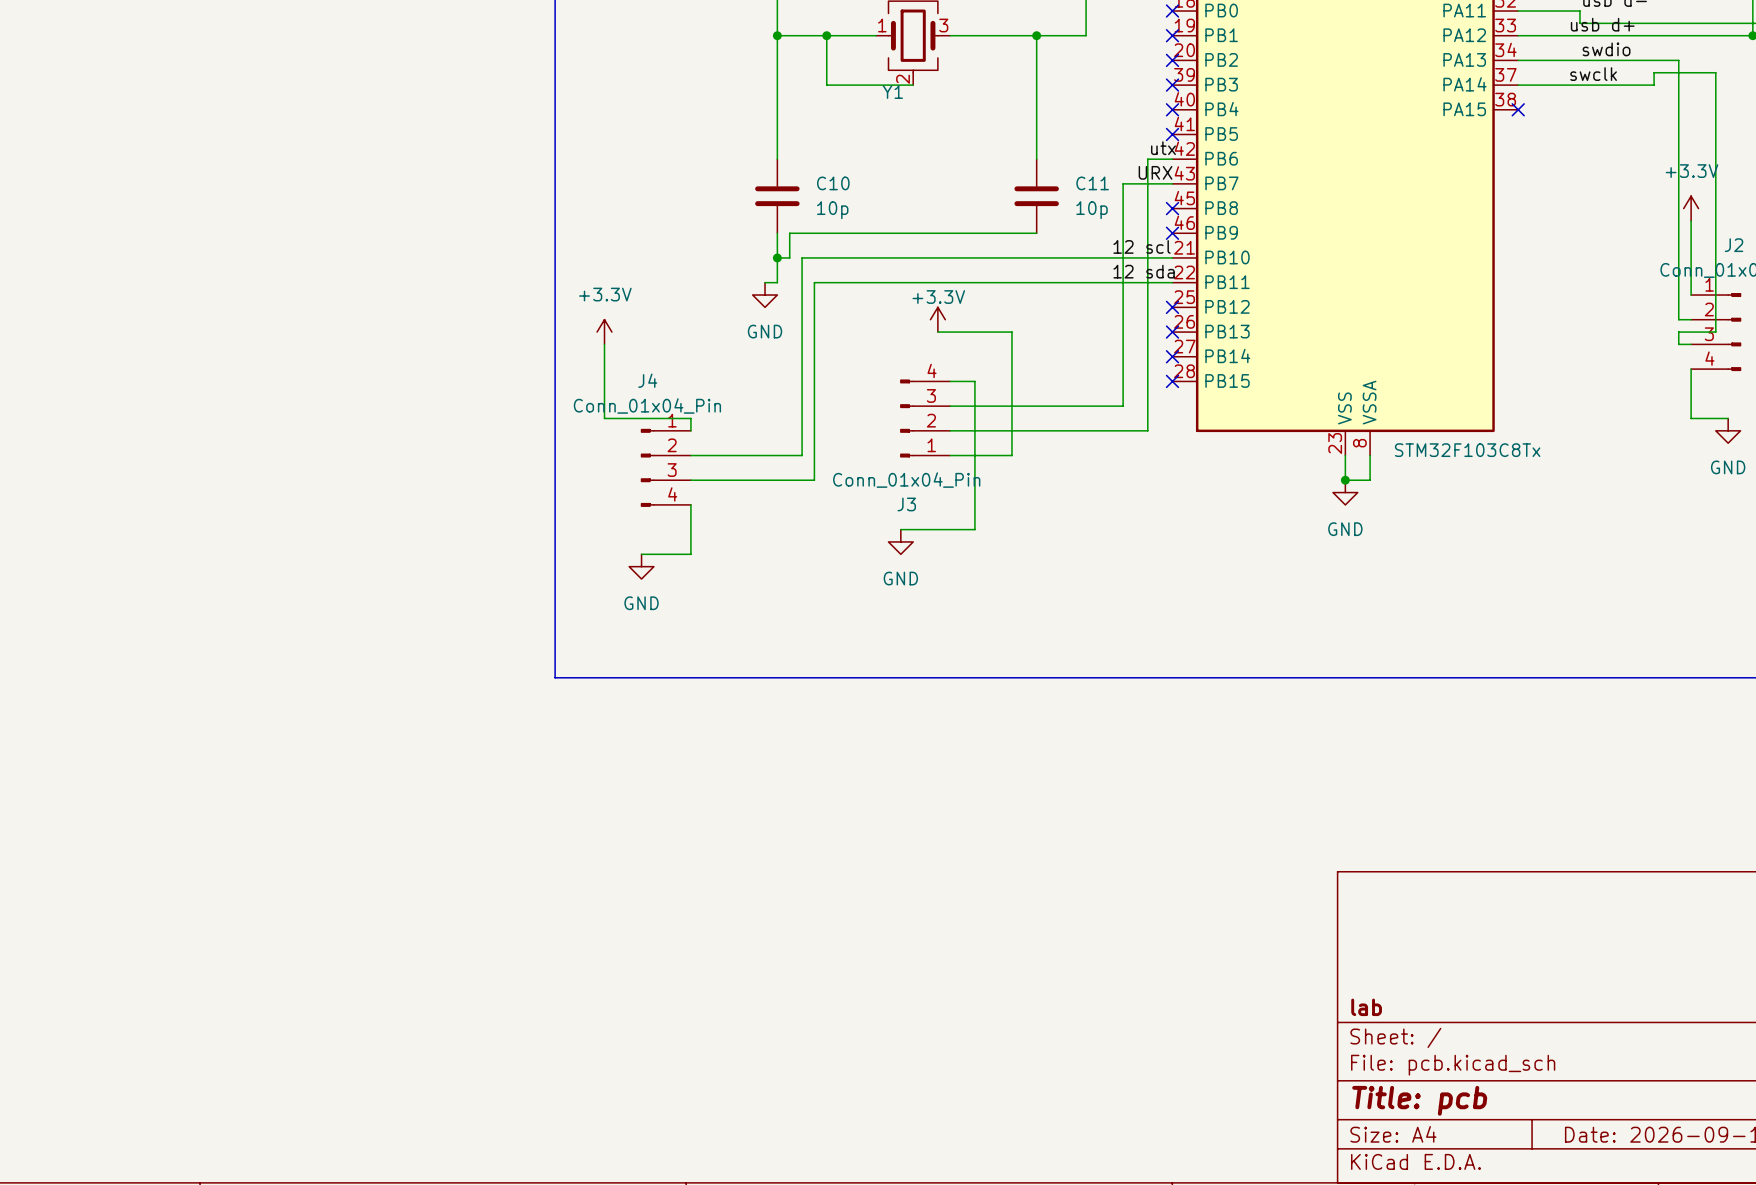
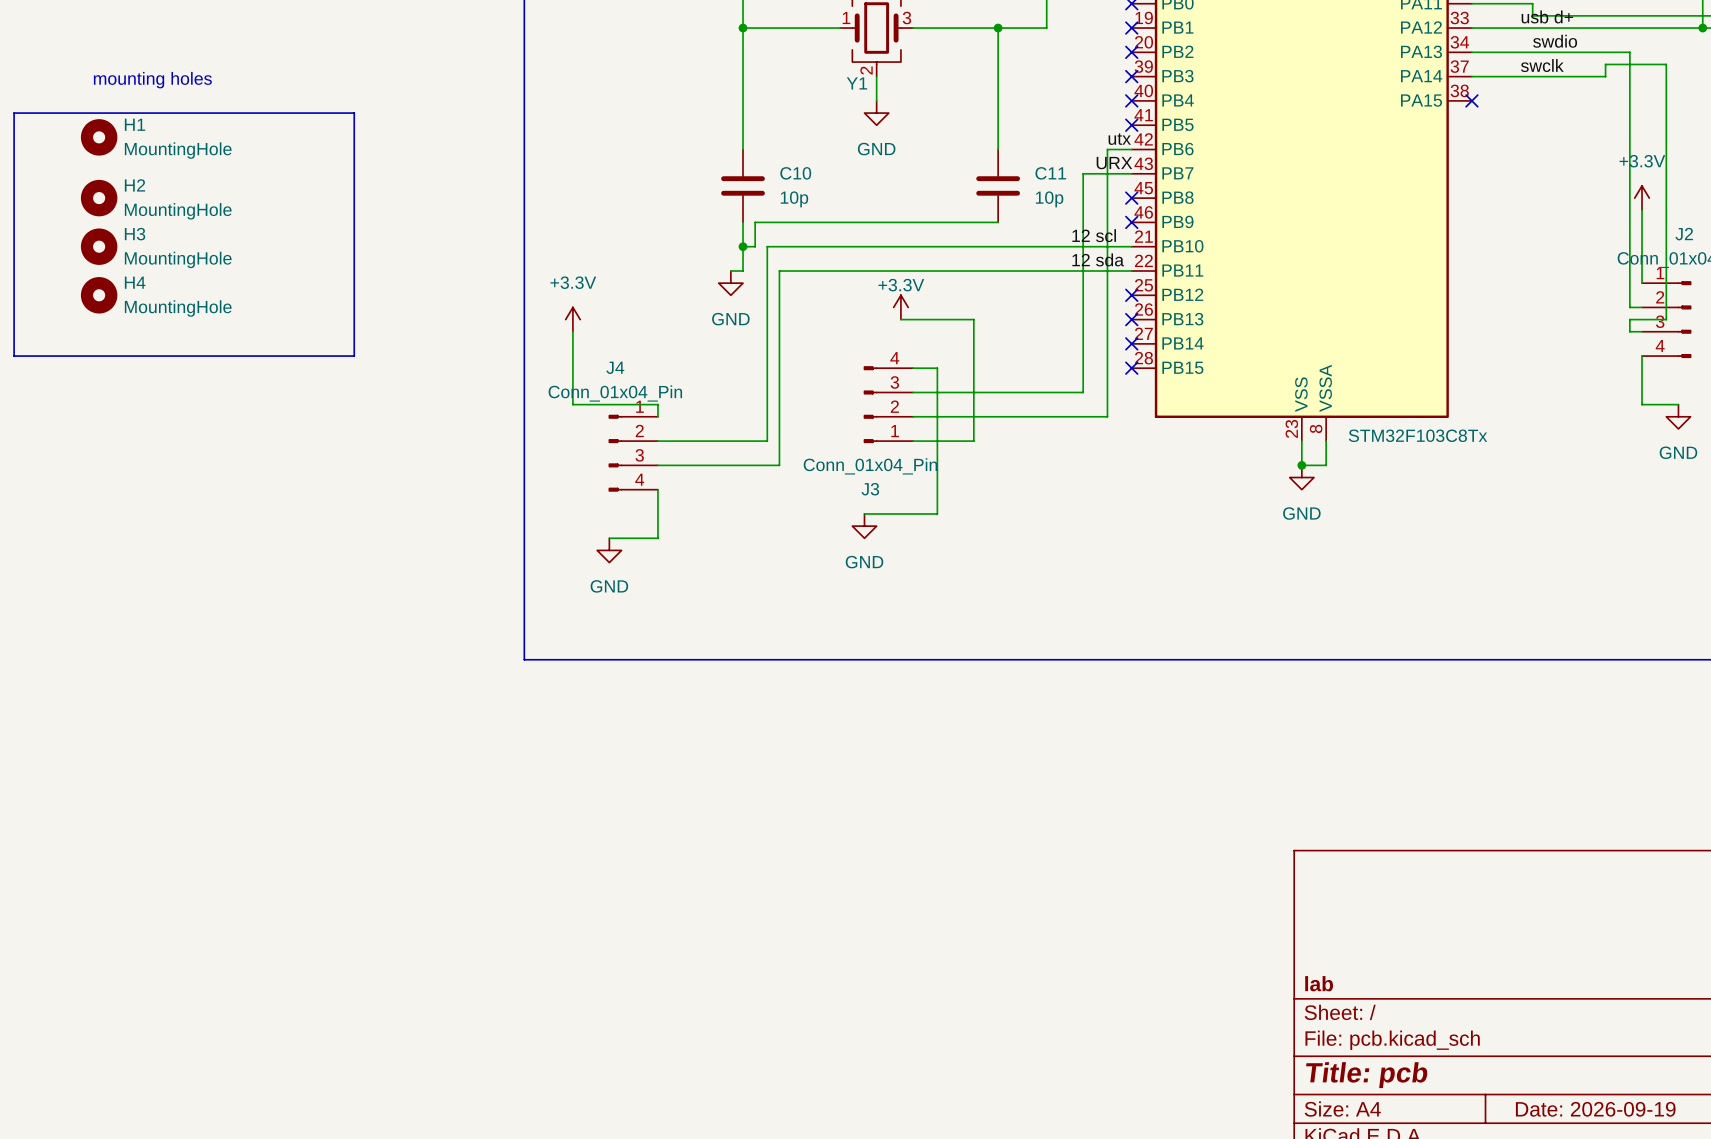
wire: (826, 35) (826, 85) (913, 85) -> (876, 100) (876, 76)
junction: (826, 35) -> none
text: none -> mounting holes (152, 80)
line: none -> (14, 113) (354, 113) (354, 356) (14, 356) (14, 113)
power symbol: none -> GND (876, 113)
H1: none -> MountingHole (99, 137)
H2: none -> MountingHole (99, 198)
H3: none -> MountingHole (99, 246)
H4: none -> MountingHole (99, 295)

